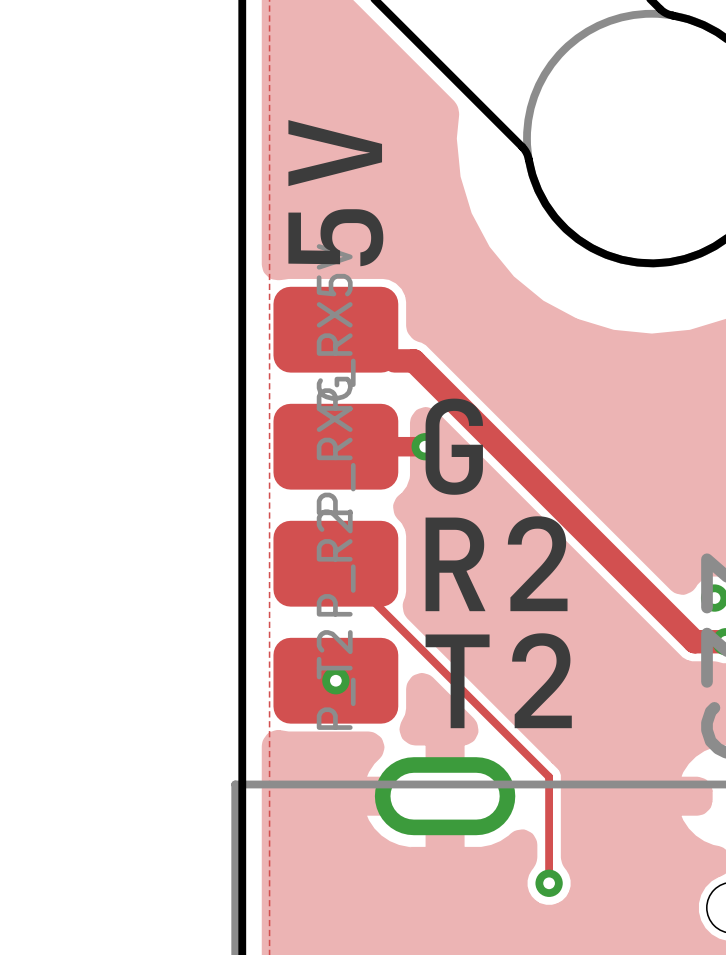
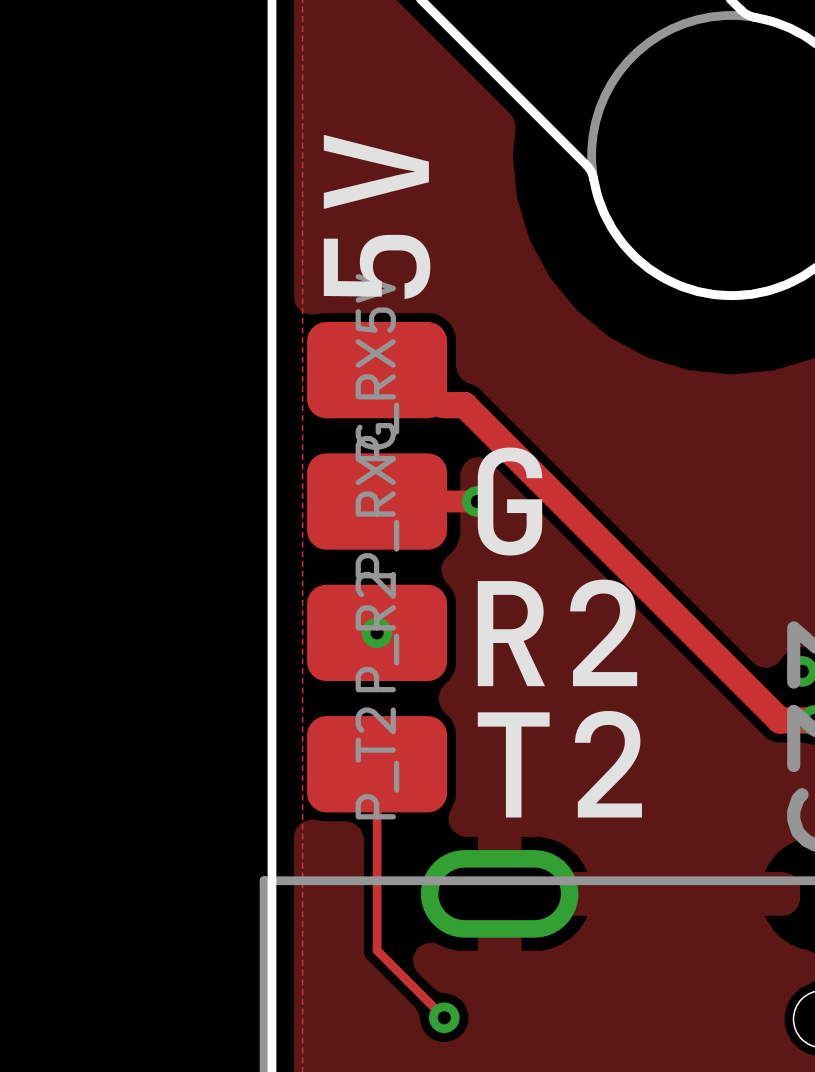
track: (335, 563) (549, 776) (549, 883) -> none
via: none -> (377, 632)
track: none -> (377, 764) (377, 950) (444, 1017)
via: (335, 680) -> none
via: (549, 883) -> none
via: none -> (444, 1017)

